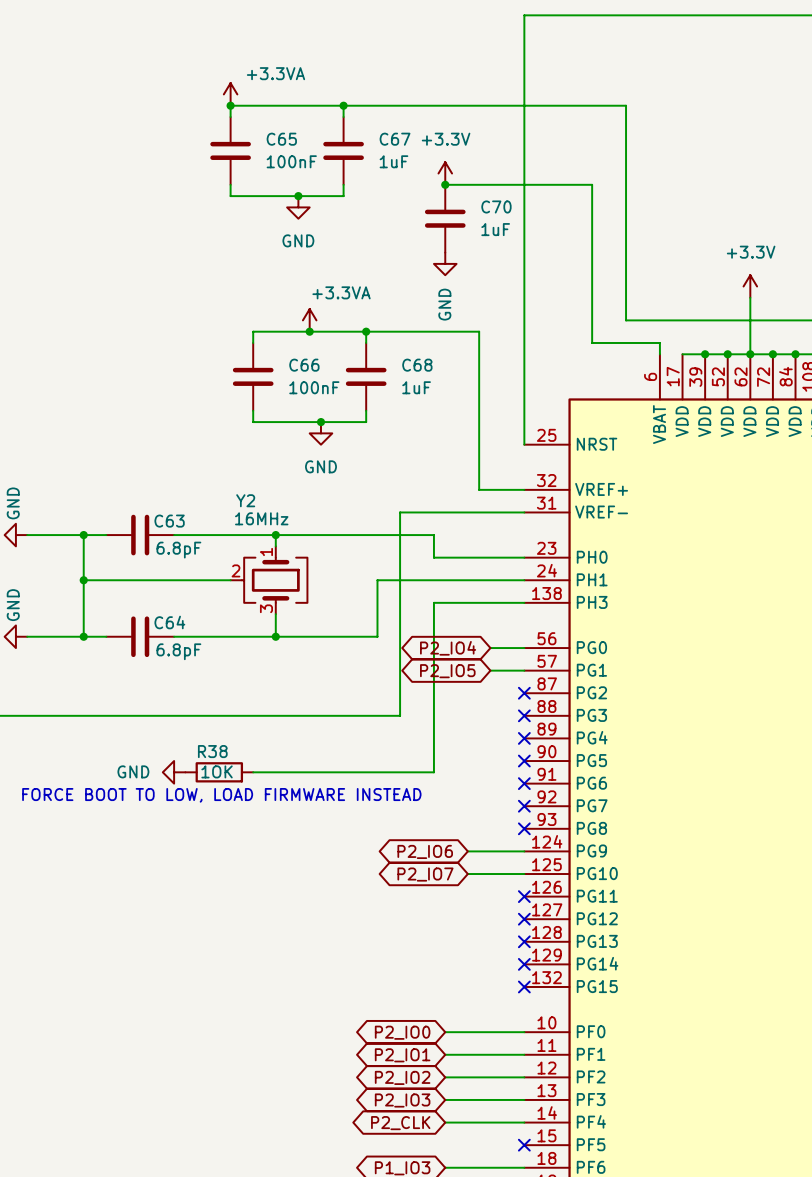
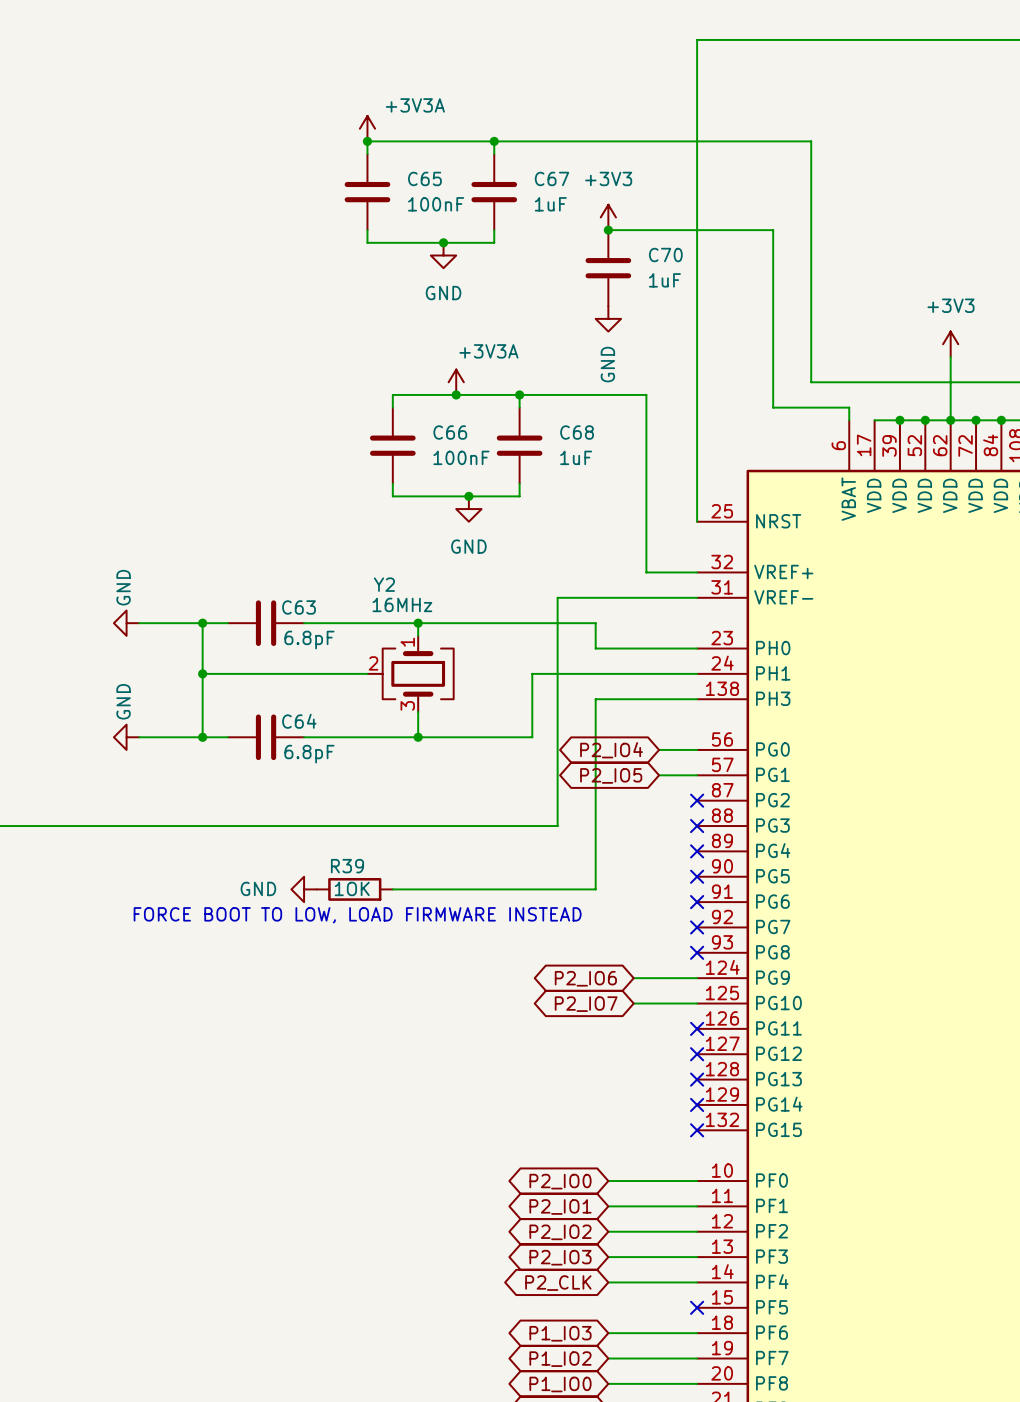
power symbol: +3.3VA (230, 94) -> +3V3A (367, 128)
power symbol: +3.3V (445, 173) -> +3V3 (608, 217)
power symbol: +3.3V (750, 286) -> +3V3 (950, 344)
power symbol: +3.3VA (309, 320) -> +3V3A (456, 382)
R38 name: R38 (212, 751) -> R39 (347, 866)

